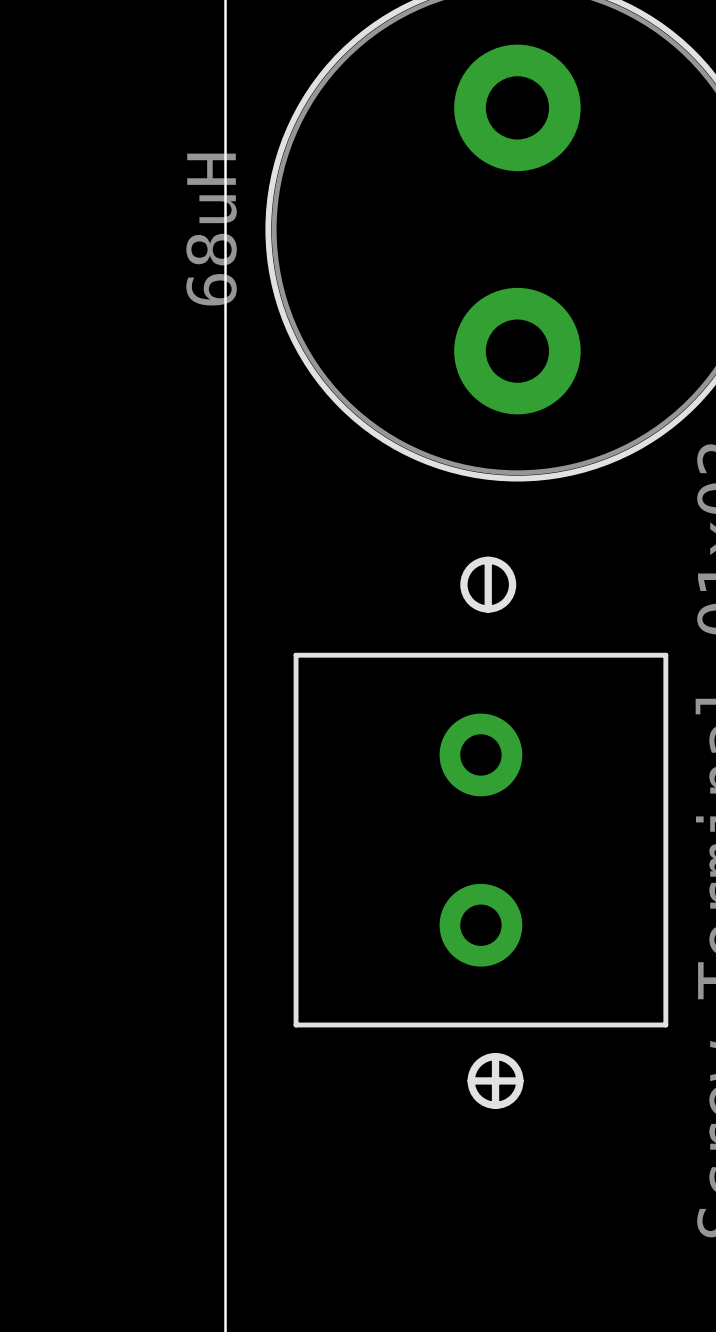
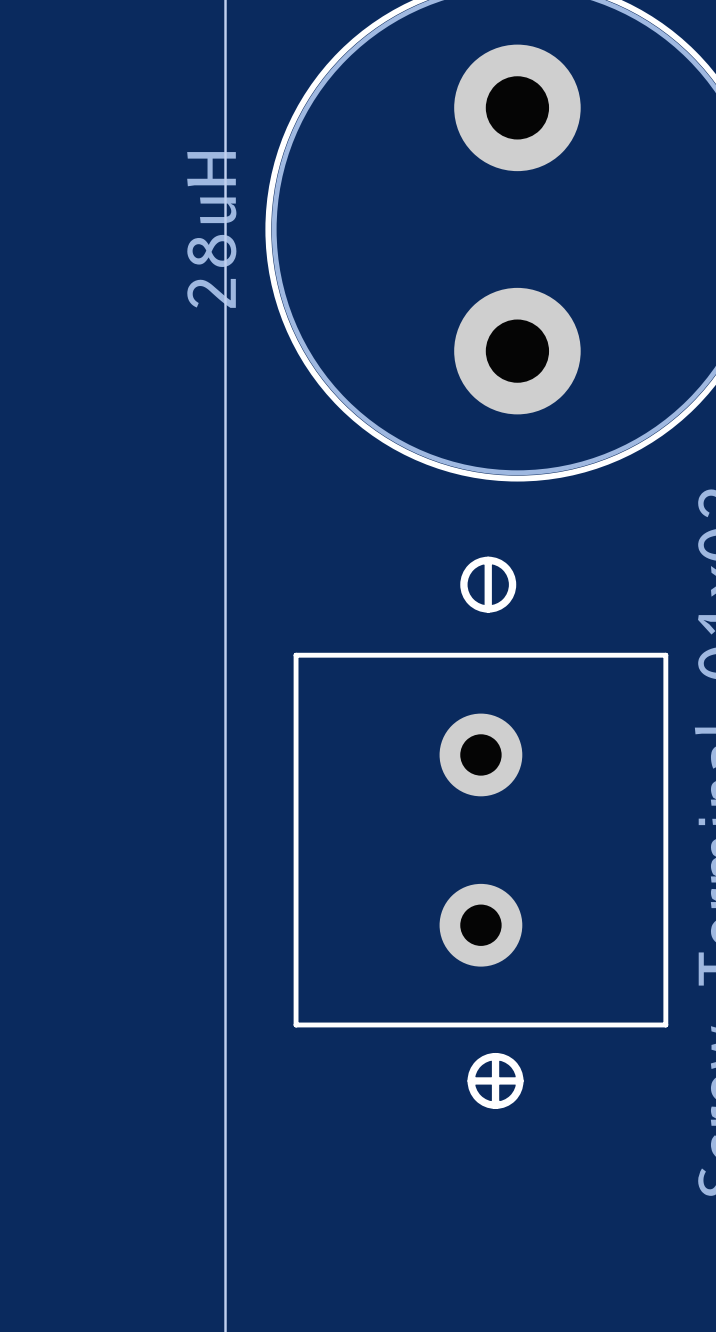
part value: 68uH (211, 229) -> 28uH (211, 229)

